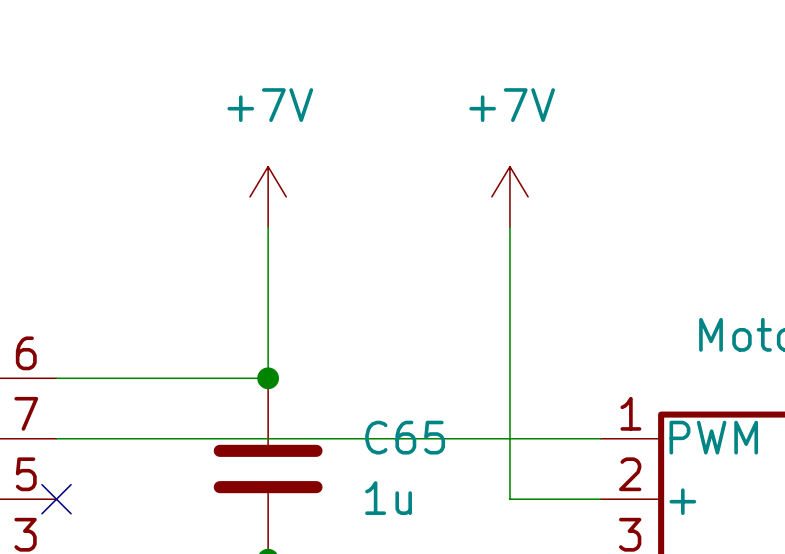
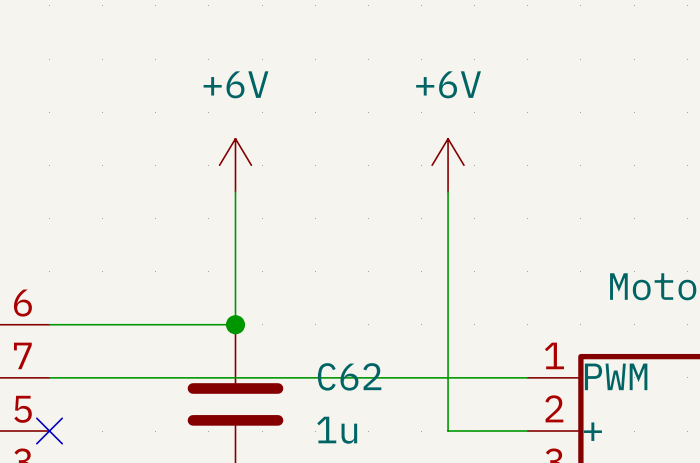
power symbol: +7V (268, 196) -> +6V (235, 165)
power symbol: +7V (509, 196) -> +6V (448, 165)
C65 name: C65 (405, 437) -> C62 (349, 376)

